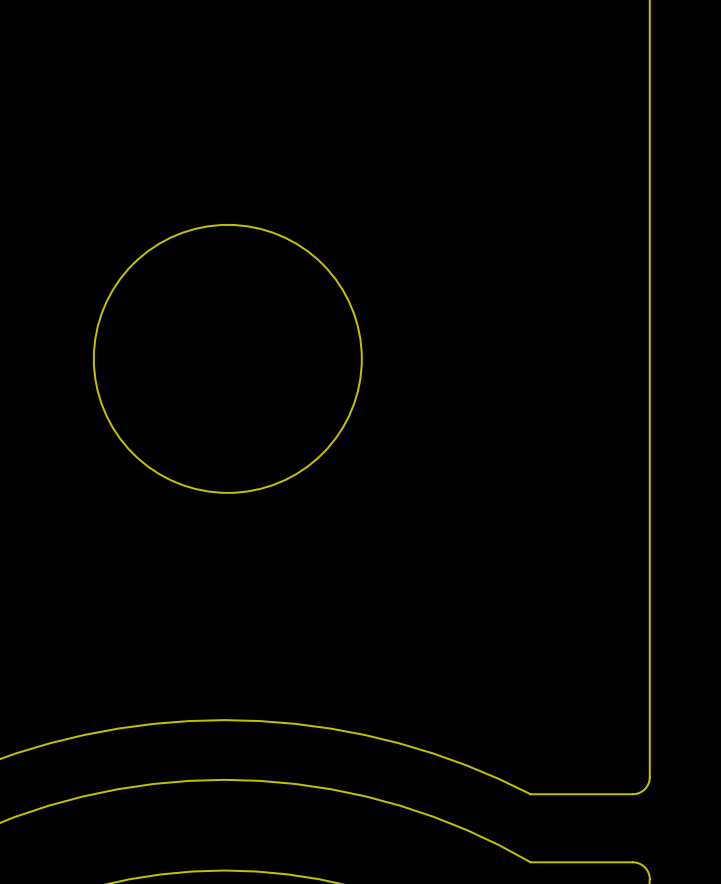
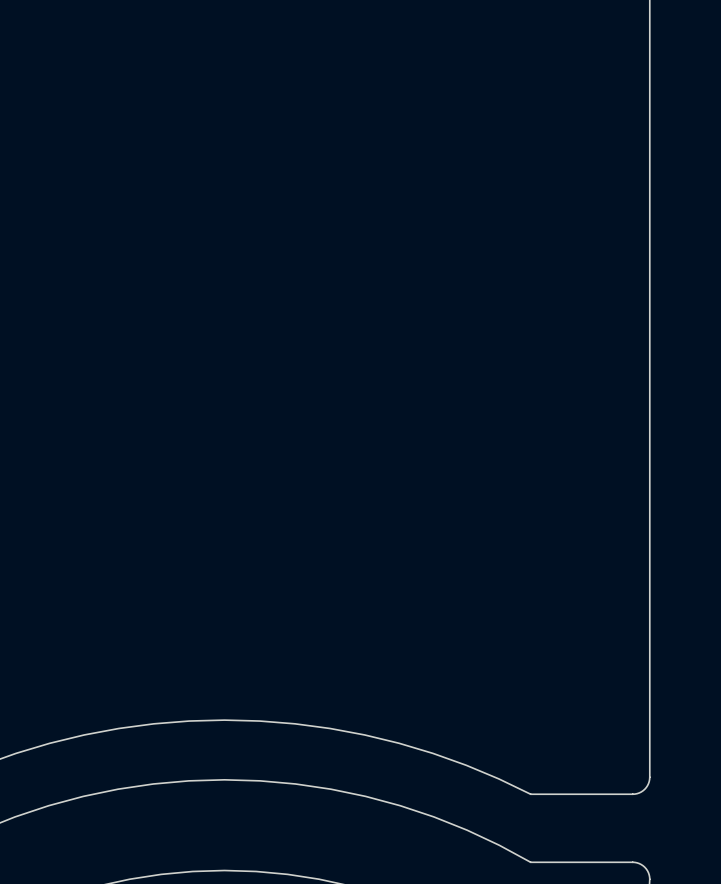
round board edge: [92, 224, 363, 494] -> none

